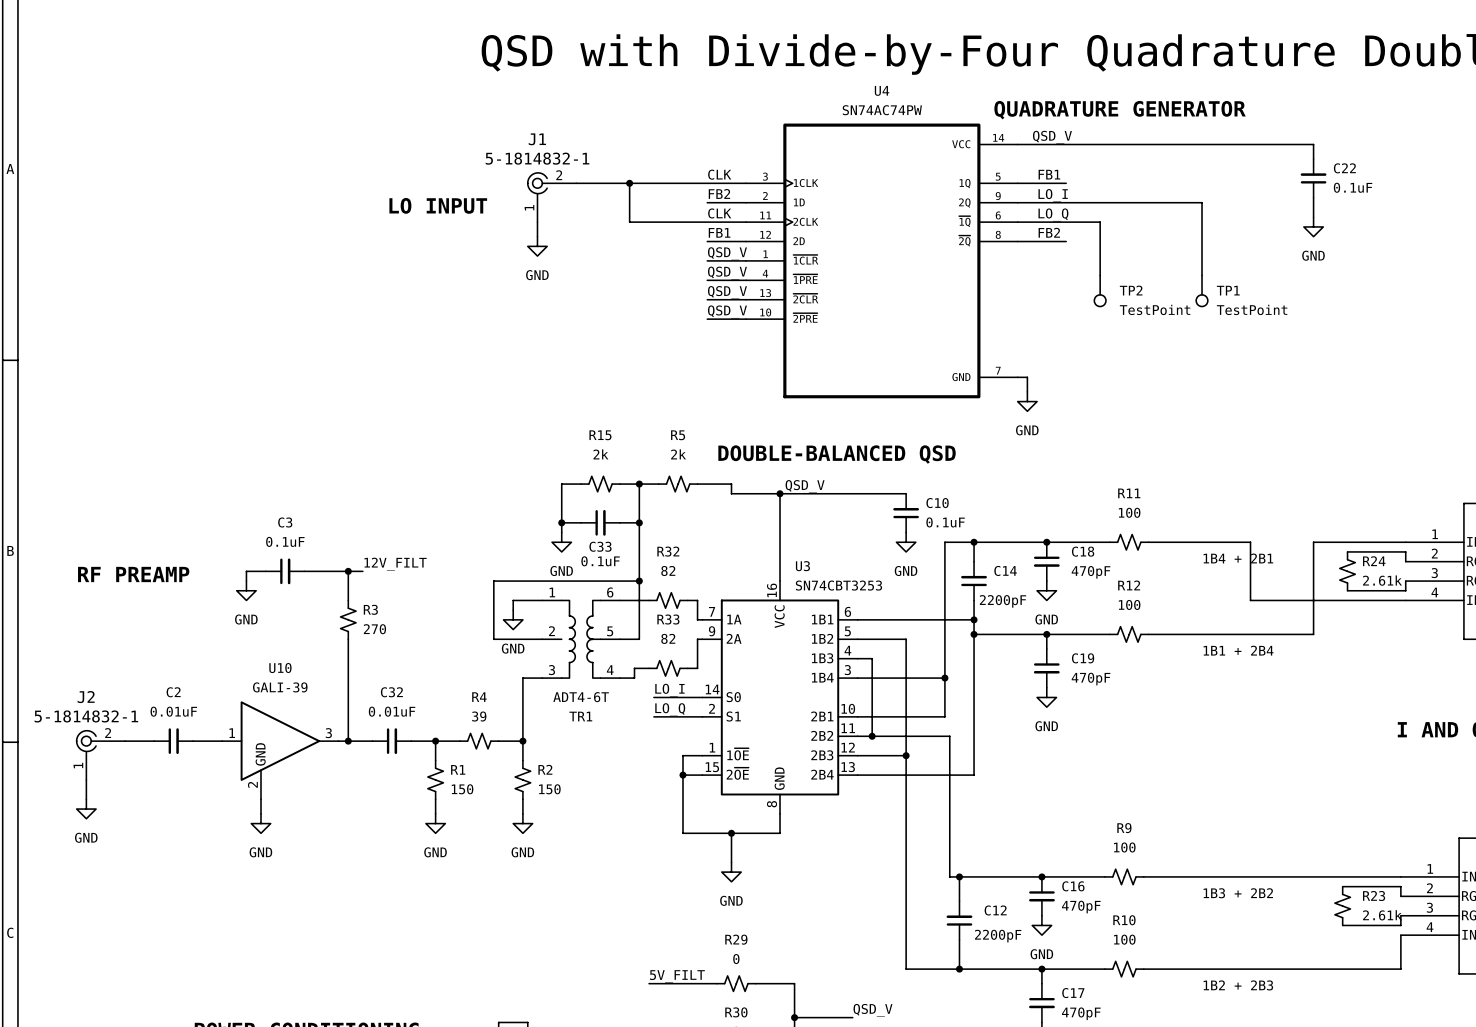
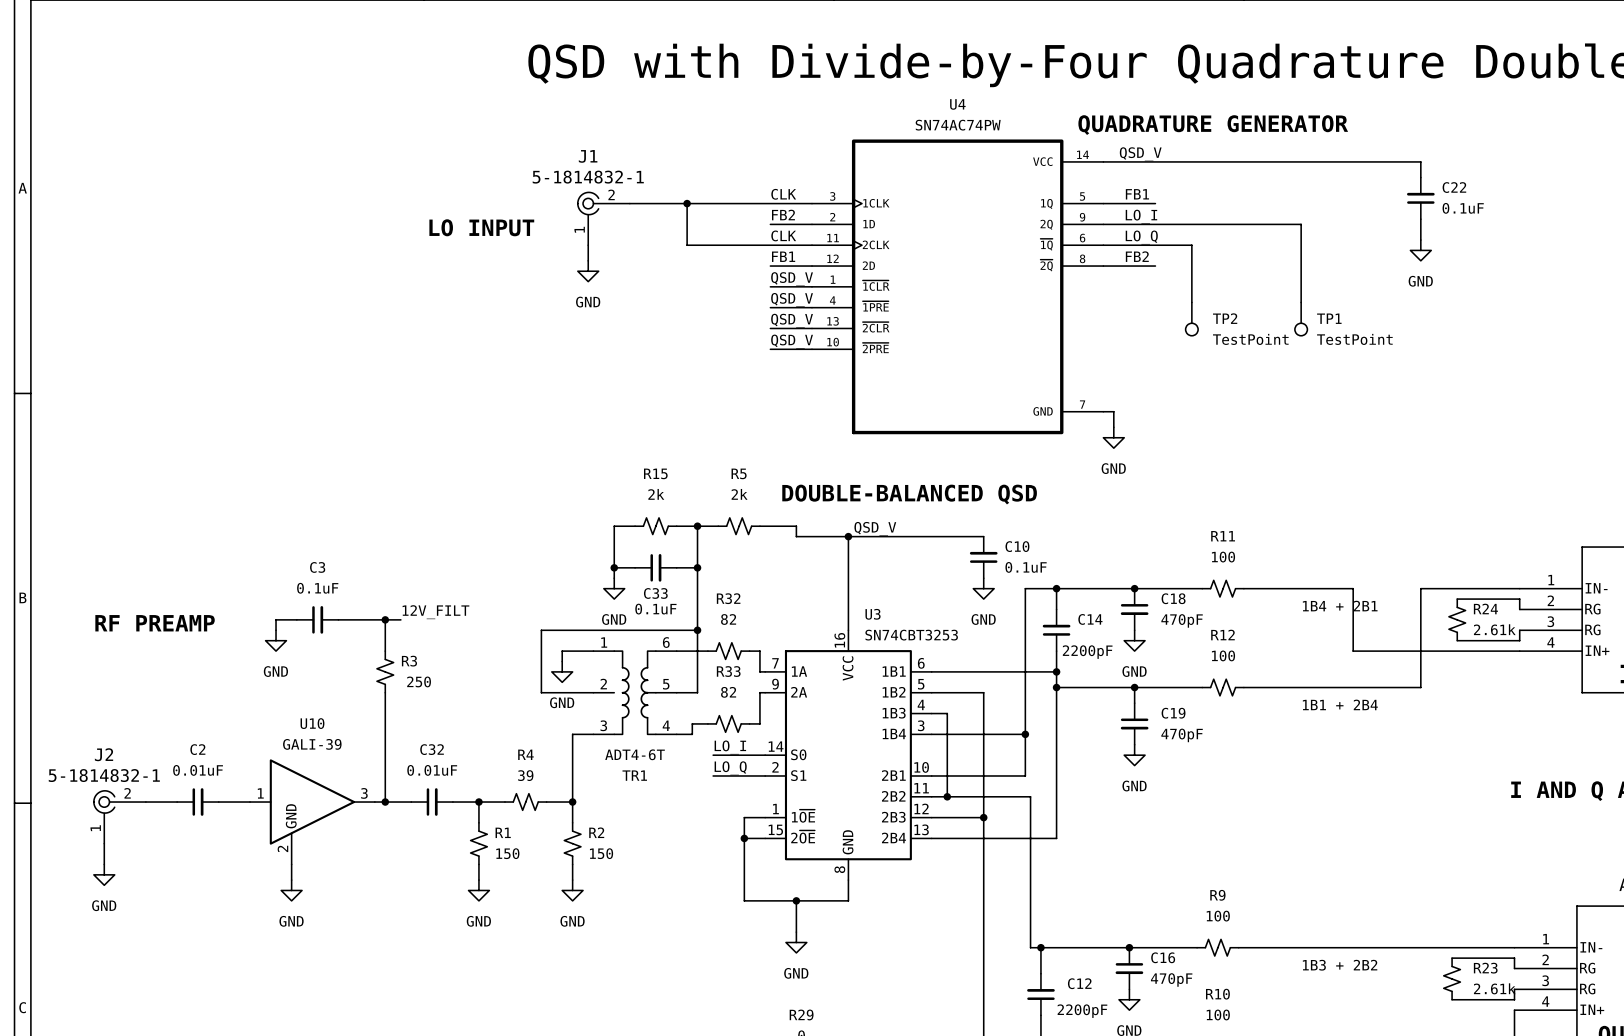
R3 value: 270 (374, 629) -> 250 (419, 681)

